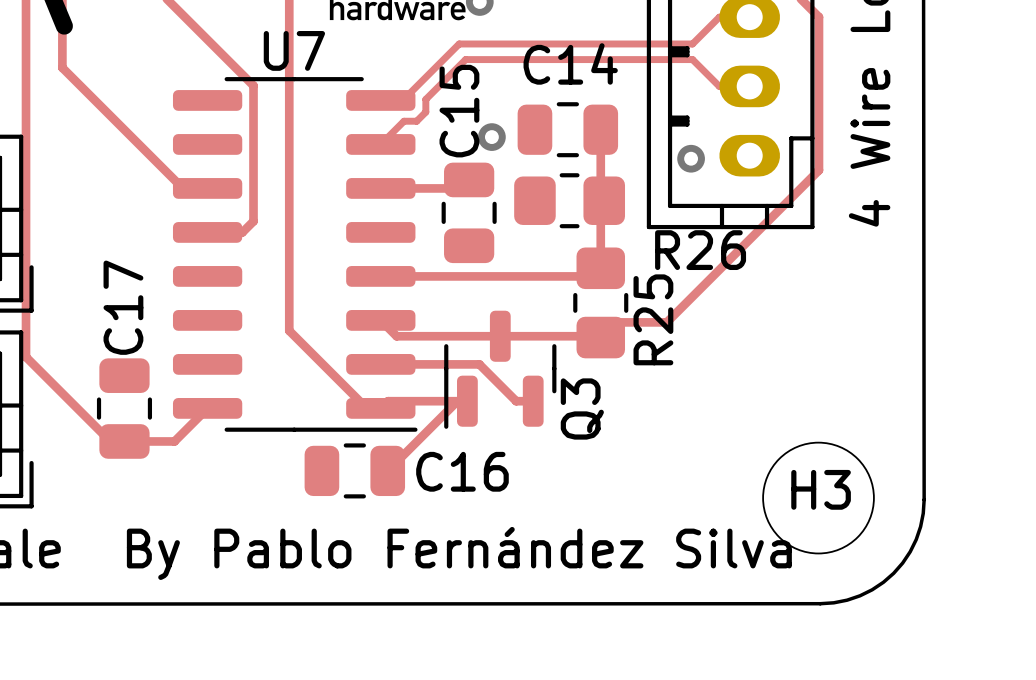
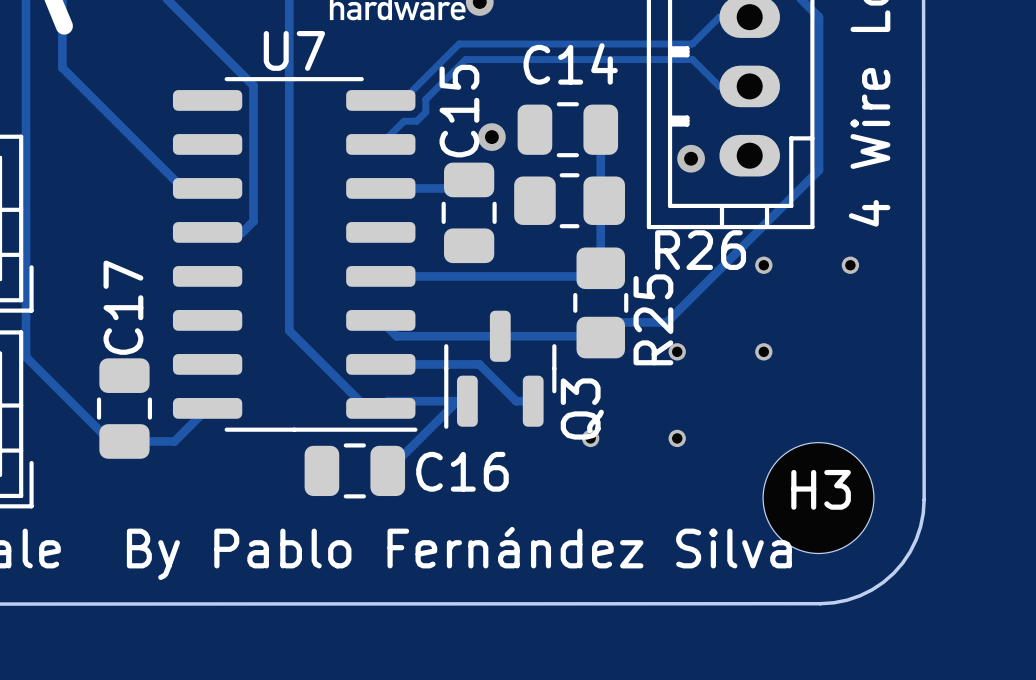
via: none -> (763, 265)
via: none -> (850, 265)
via: none -> (677, 351)
via: none -> (763, 351)
via: none -> (590, 438)
via: none -> (677, 438)

